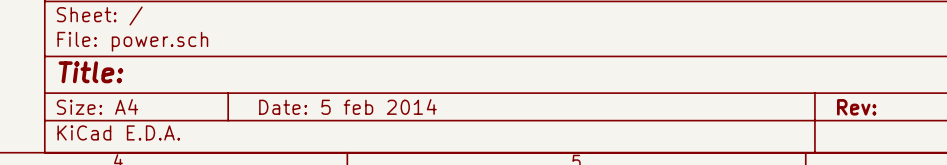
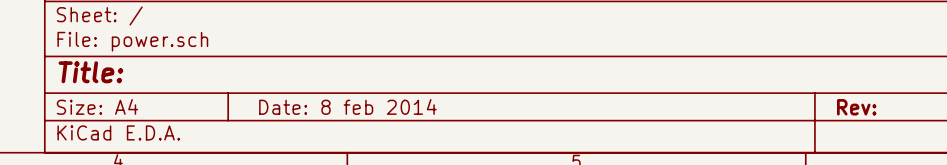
title block: Date: 5 feb 2014 (347, 106) -> Date: 8 feb 2014 (347, 106)

